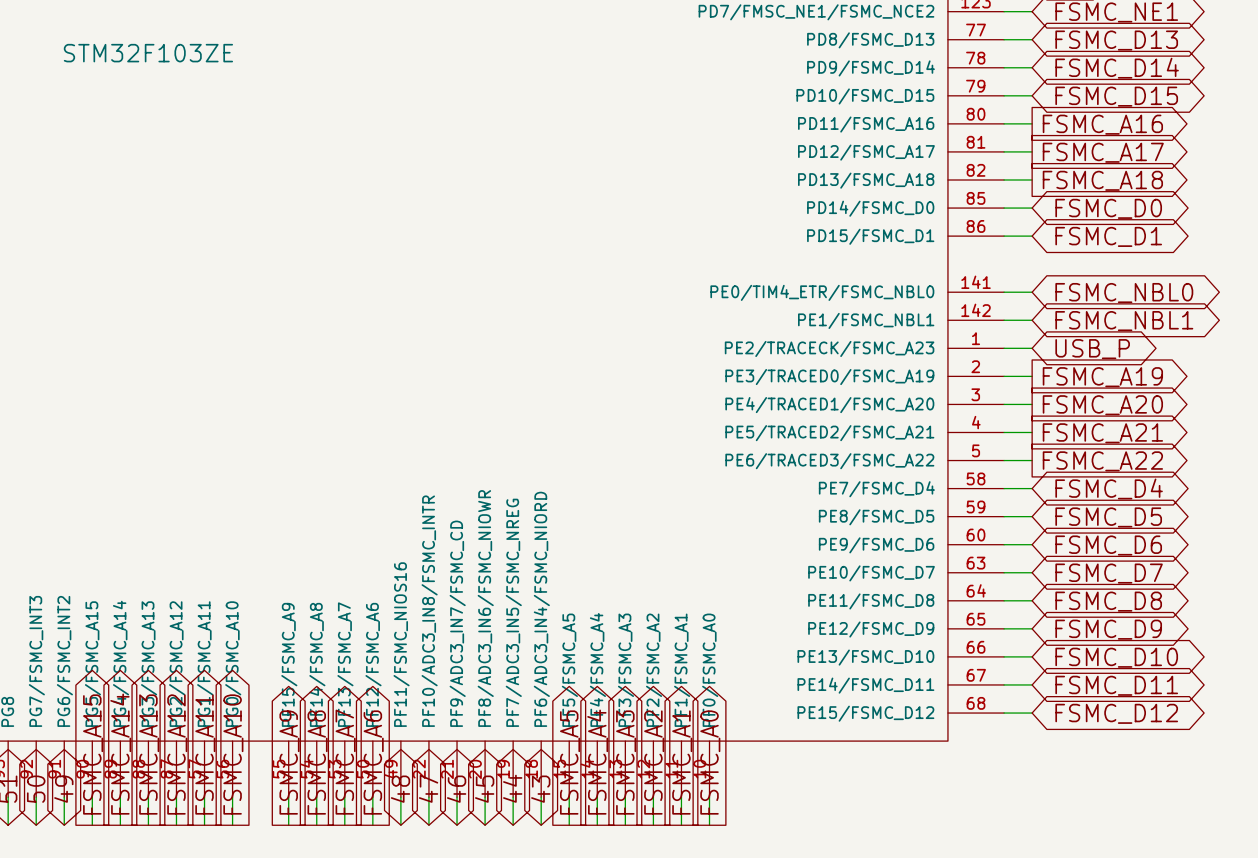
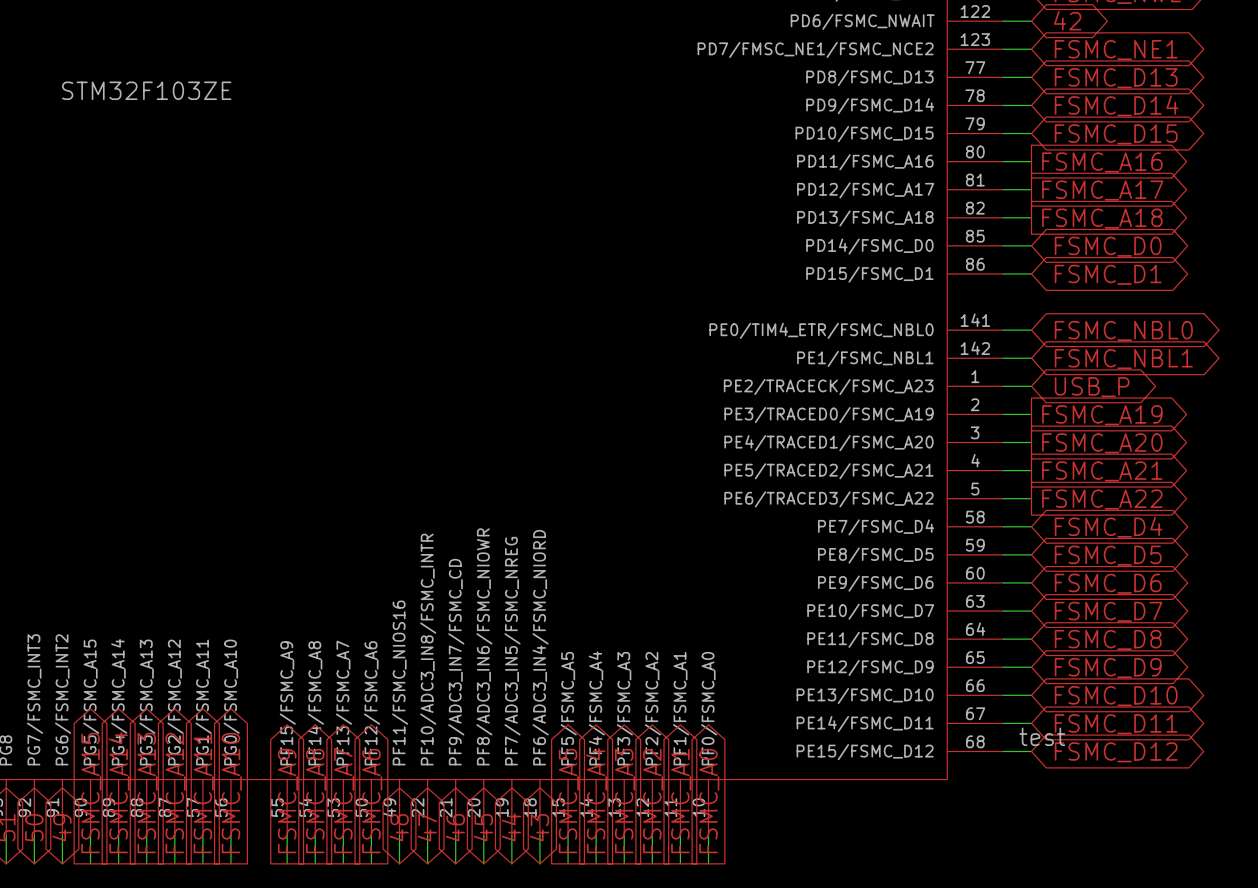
label: none -> test (1042, 736)

